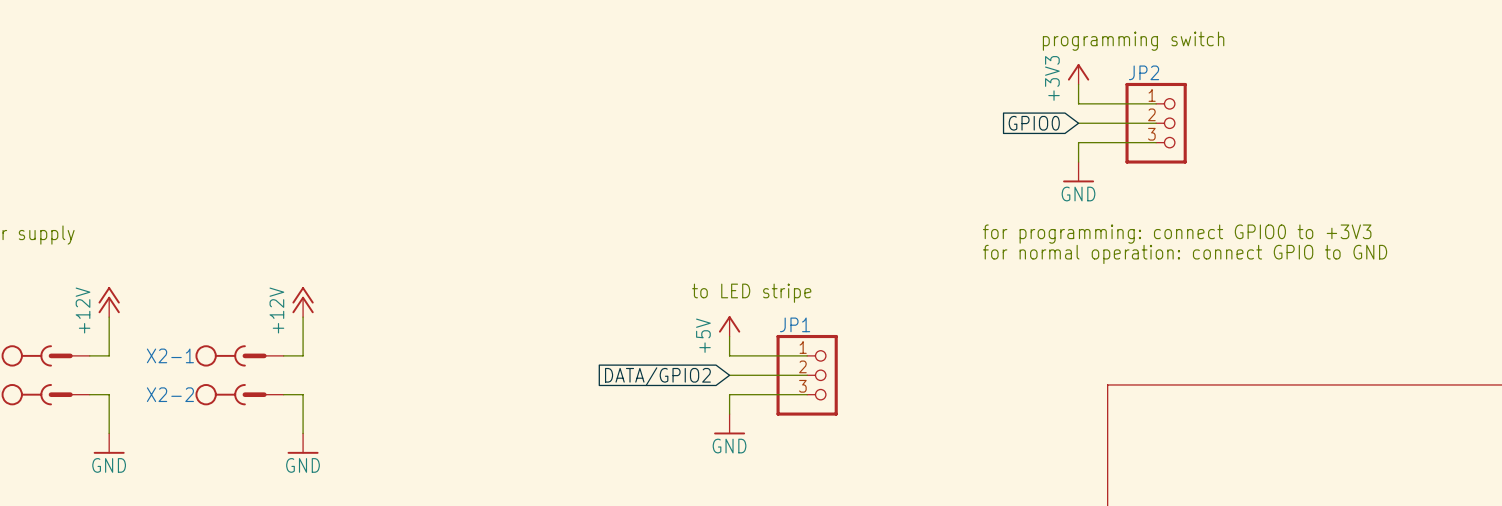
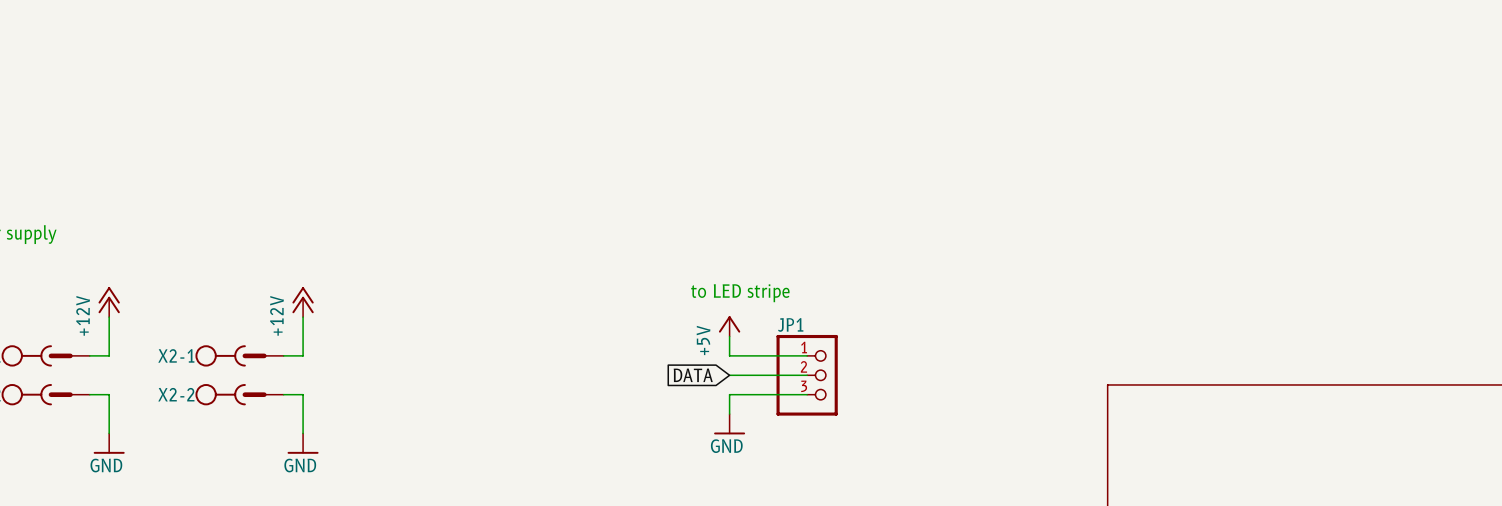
text: programming switch (1133, 41) -> none
power symbol: +3V3 (1078, 74) -> none
wire: (1078, 84) (1078, 103) (1156, 103) -> none
global label: GPIO0 (1034, 123) -> none
wire: (1078, 123) (1156, 123) -> none
JP2: (1156, 123) -> none
wire: (1156, 142) (1078, 142) (1078, 162) -> none
power symbol: GND (1078, 172) -> none
text: for programming: connect GPIO0 to +3V3 (1177, 234) -> none
text: for normal operation: connect GPIO to GND (1185, 254) -> none
global label: DATA/GPIO2 (657, 376) -> DATA (693, 375)

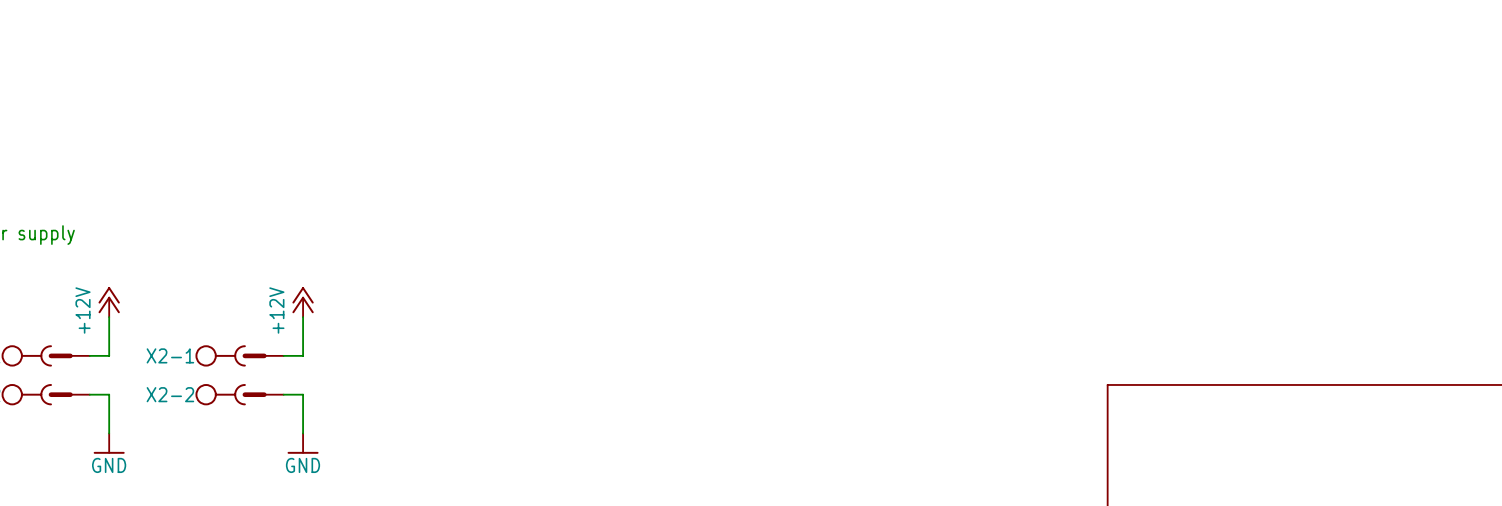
text: to LED stripe (740, 293) -> none
power symbol: +5V (729, 326) -> none
wire: (729, 336) (729, 355) (807, 355) -> none
global label: DATA (693, 375) -> none
wire: (729, 375) (807, 375) -> none
JP1: (807, 375) -> none
wire: (807, 394) (729, 394) (729, 414) -> none
power symbol: GND (729, 424) -> none

